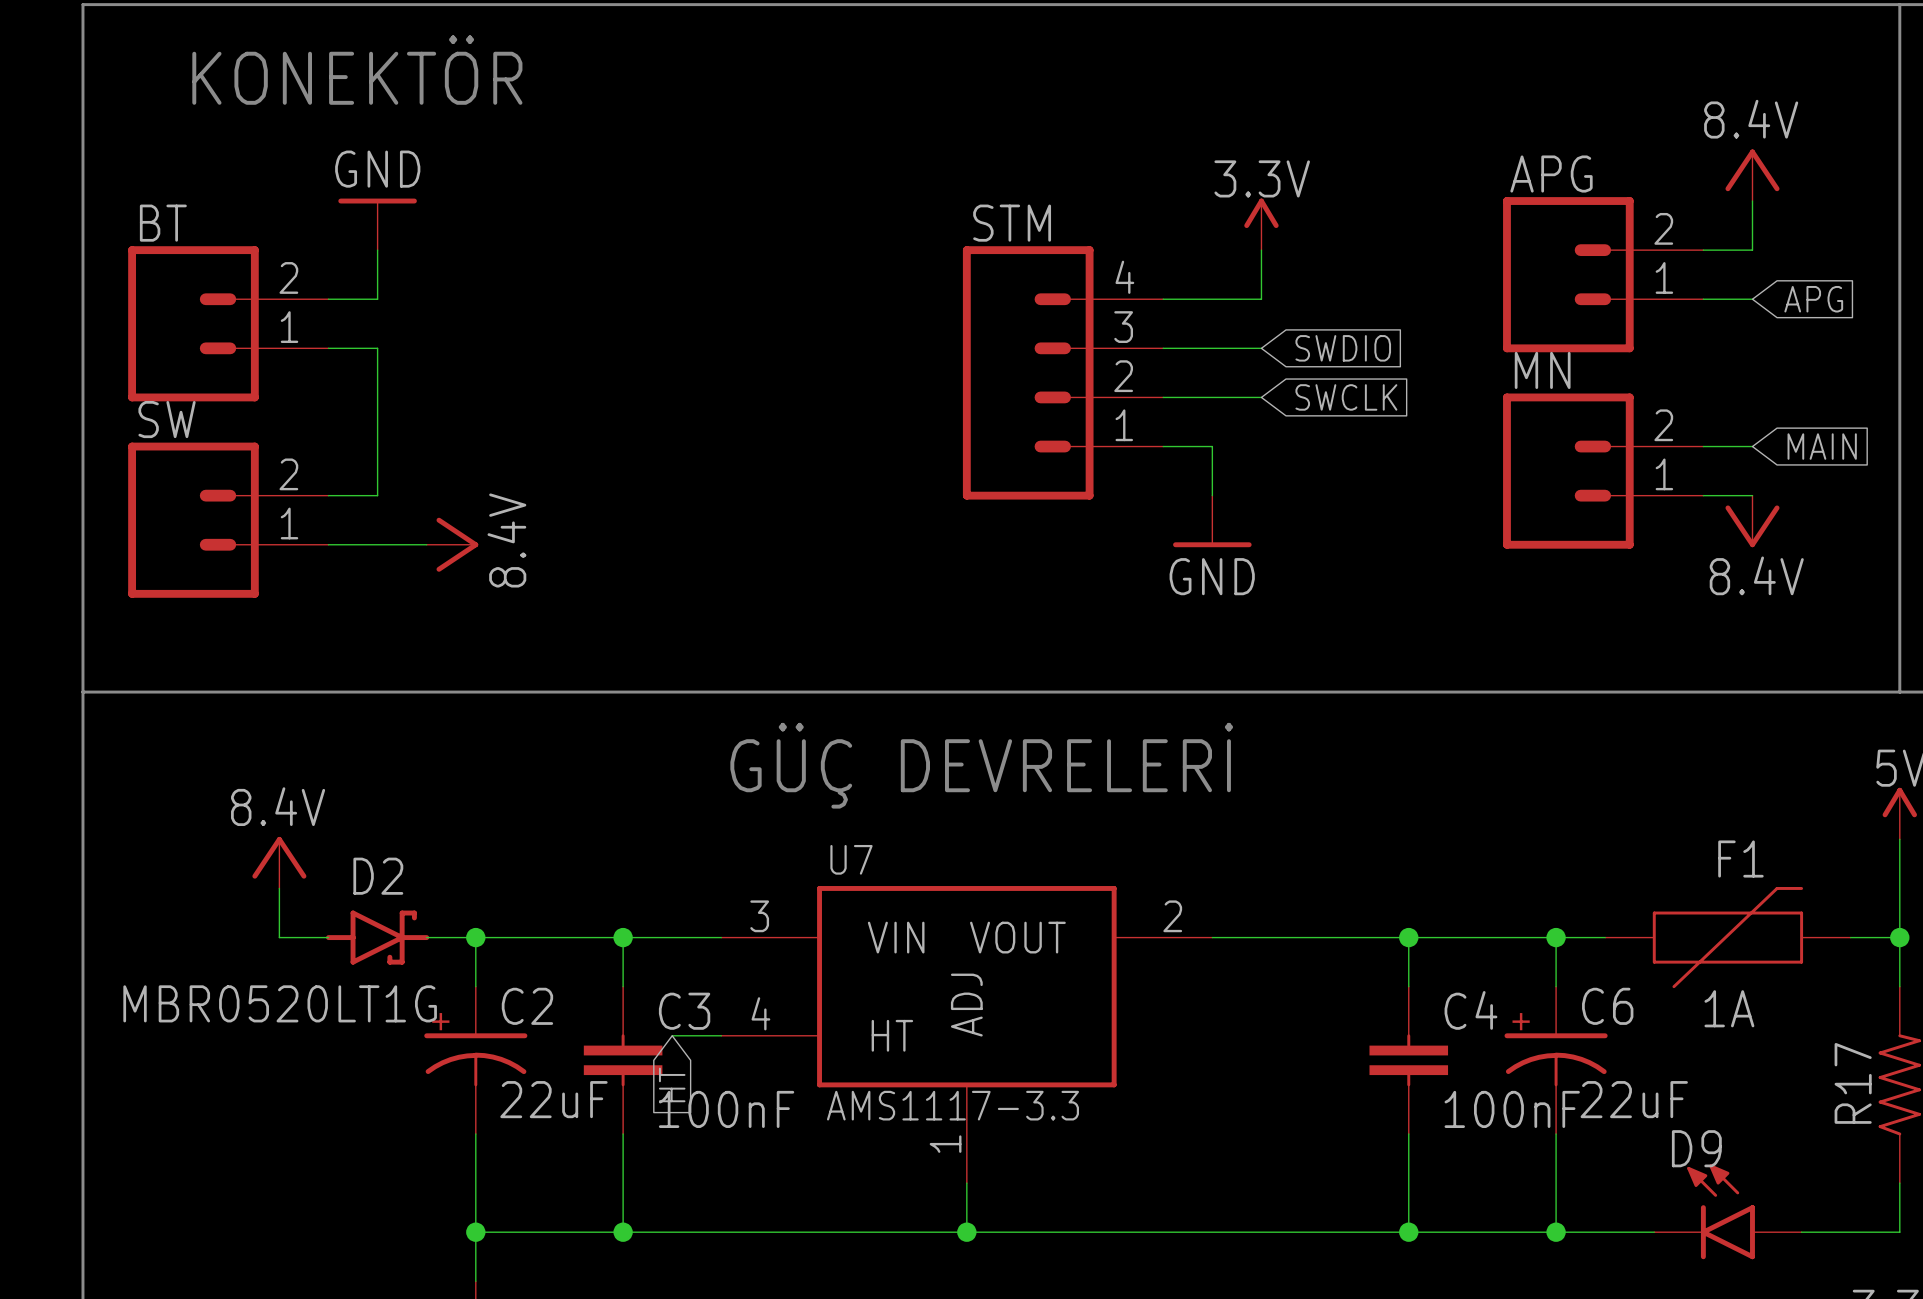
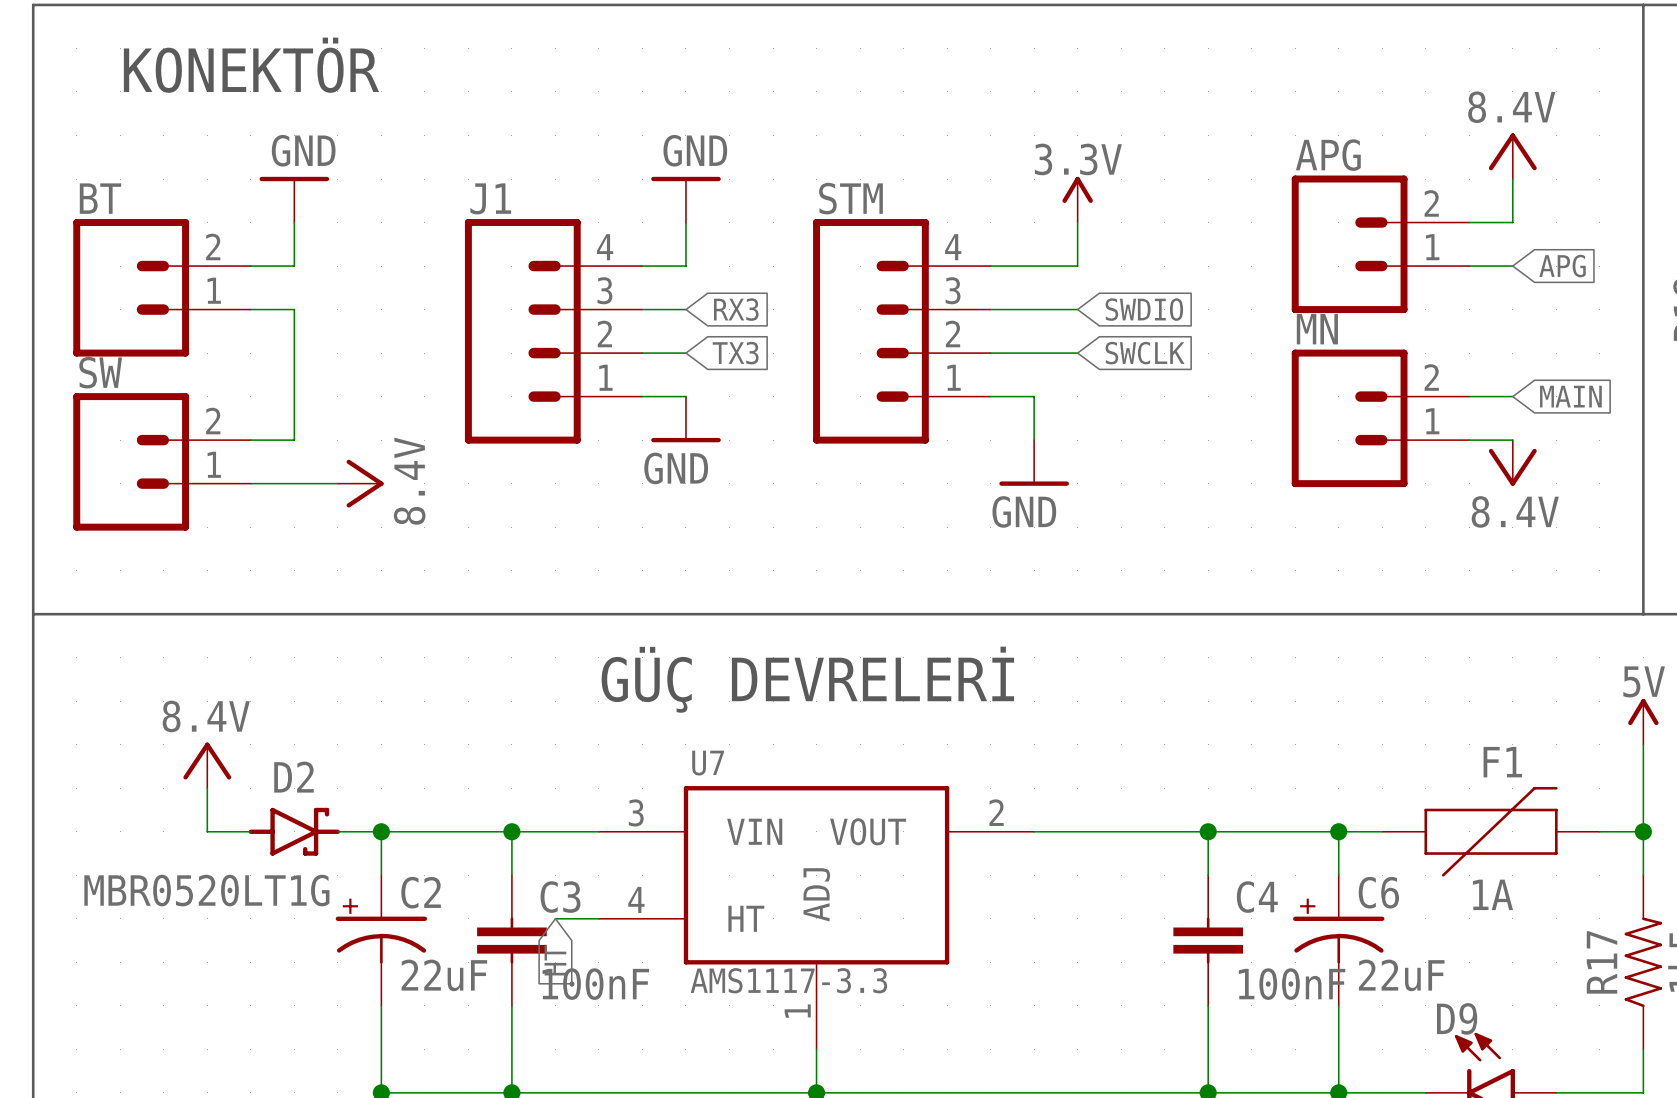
power symbol: none -> GND (685, 199)
wire: none -> (685, 222) (685, 266) (642, 266)
wire: none -> (642, 309) (685, 309)
global label: none -> RX3 (736, 309)
J1: none -> (553, 331)
wire: none -> (642, 353) (685, 353)
global label: none -> TX3 (735, 353)
wire: none -> (642, 396) (685, 396)
power symbol: none -> GND (685, 419)

